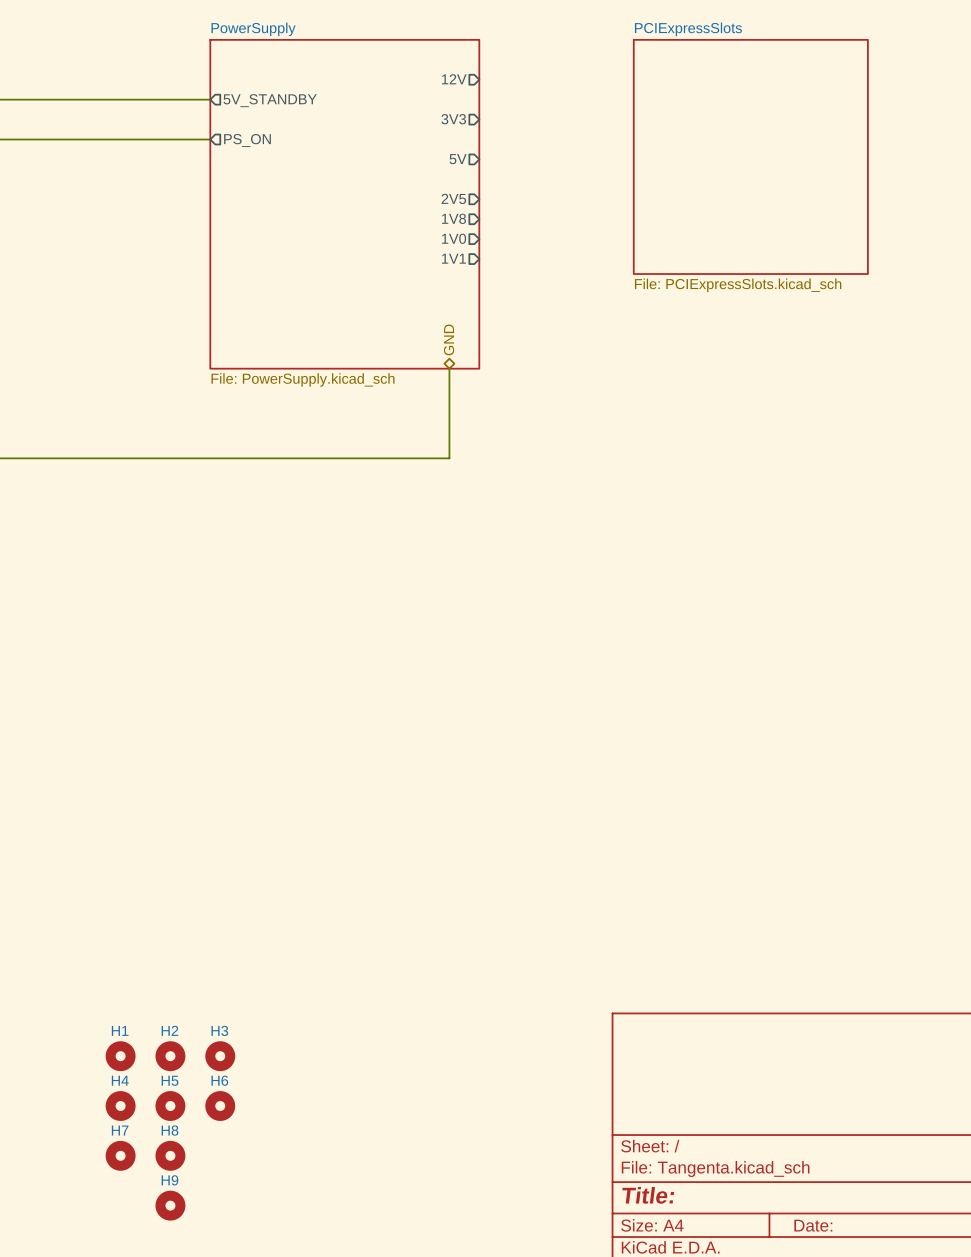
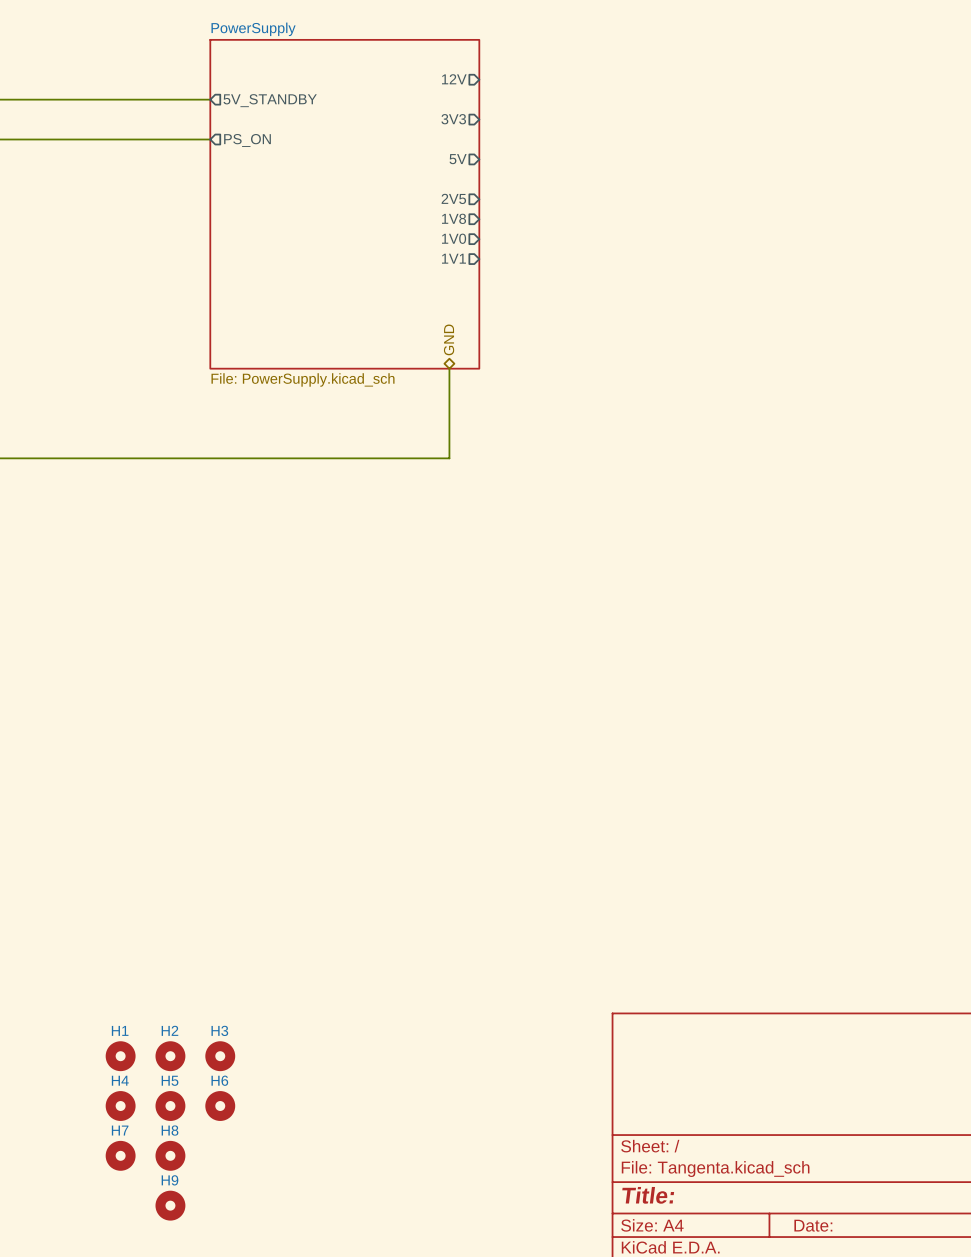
sheet PCIExpressSlots: File: PCIExpressSlots.kicad_sch (750, 156) -> none

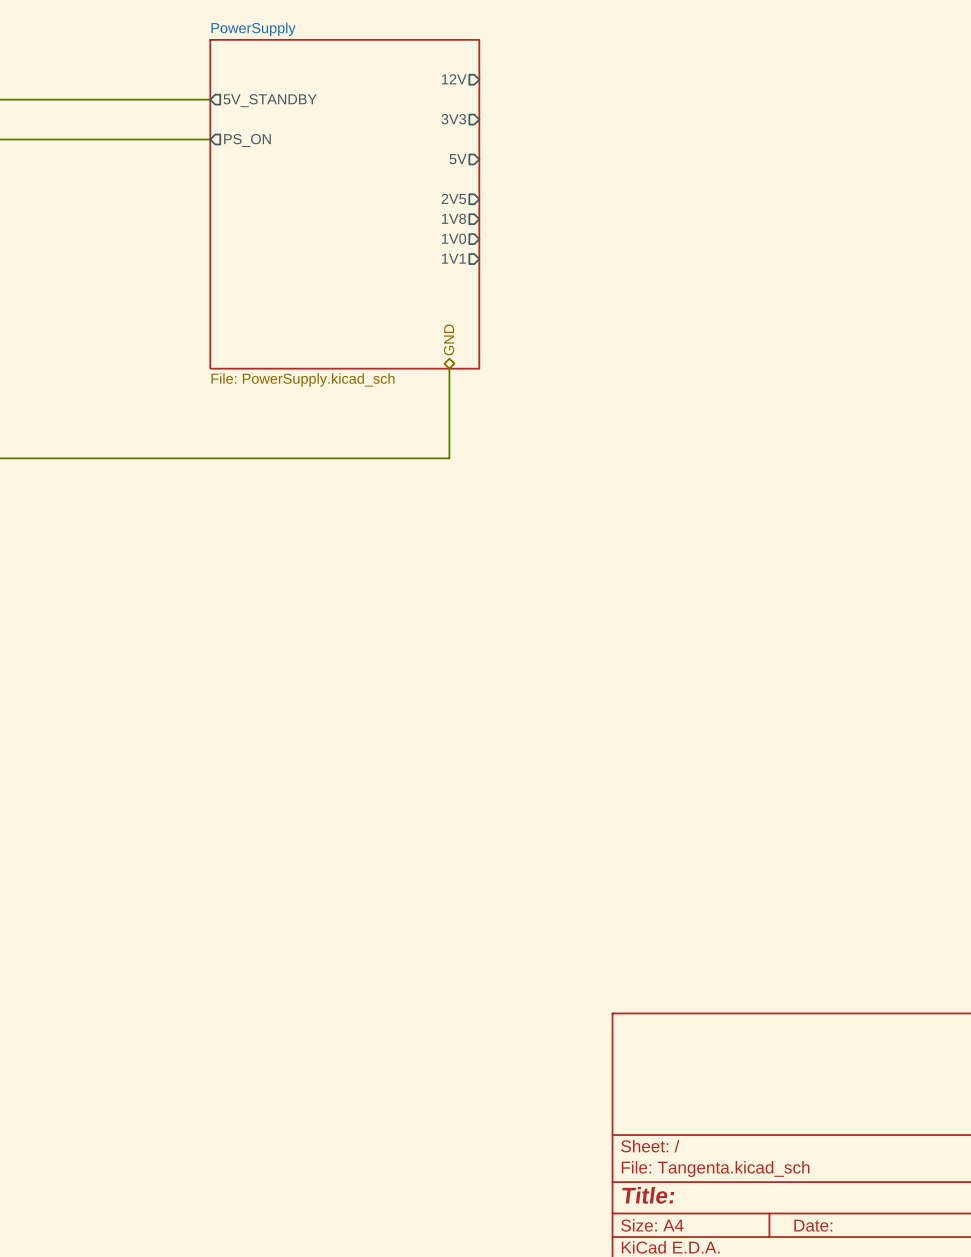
H1: (120, 1056) -> none
H2: (170, 1056) -> none
H3: (220, 1056) -> none
H4: (120, 1106) -> none
H5: (170, 1106) -> none
H6: (220, 1106) -> none
H7: (120, 1155) -> none
H8: (170, 1155) -> none
H9: (170, 1205) -> none

